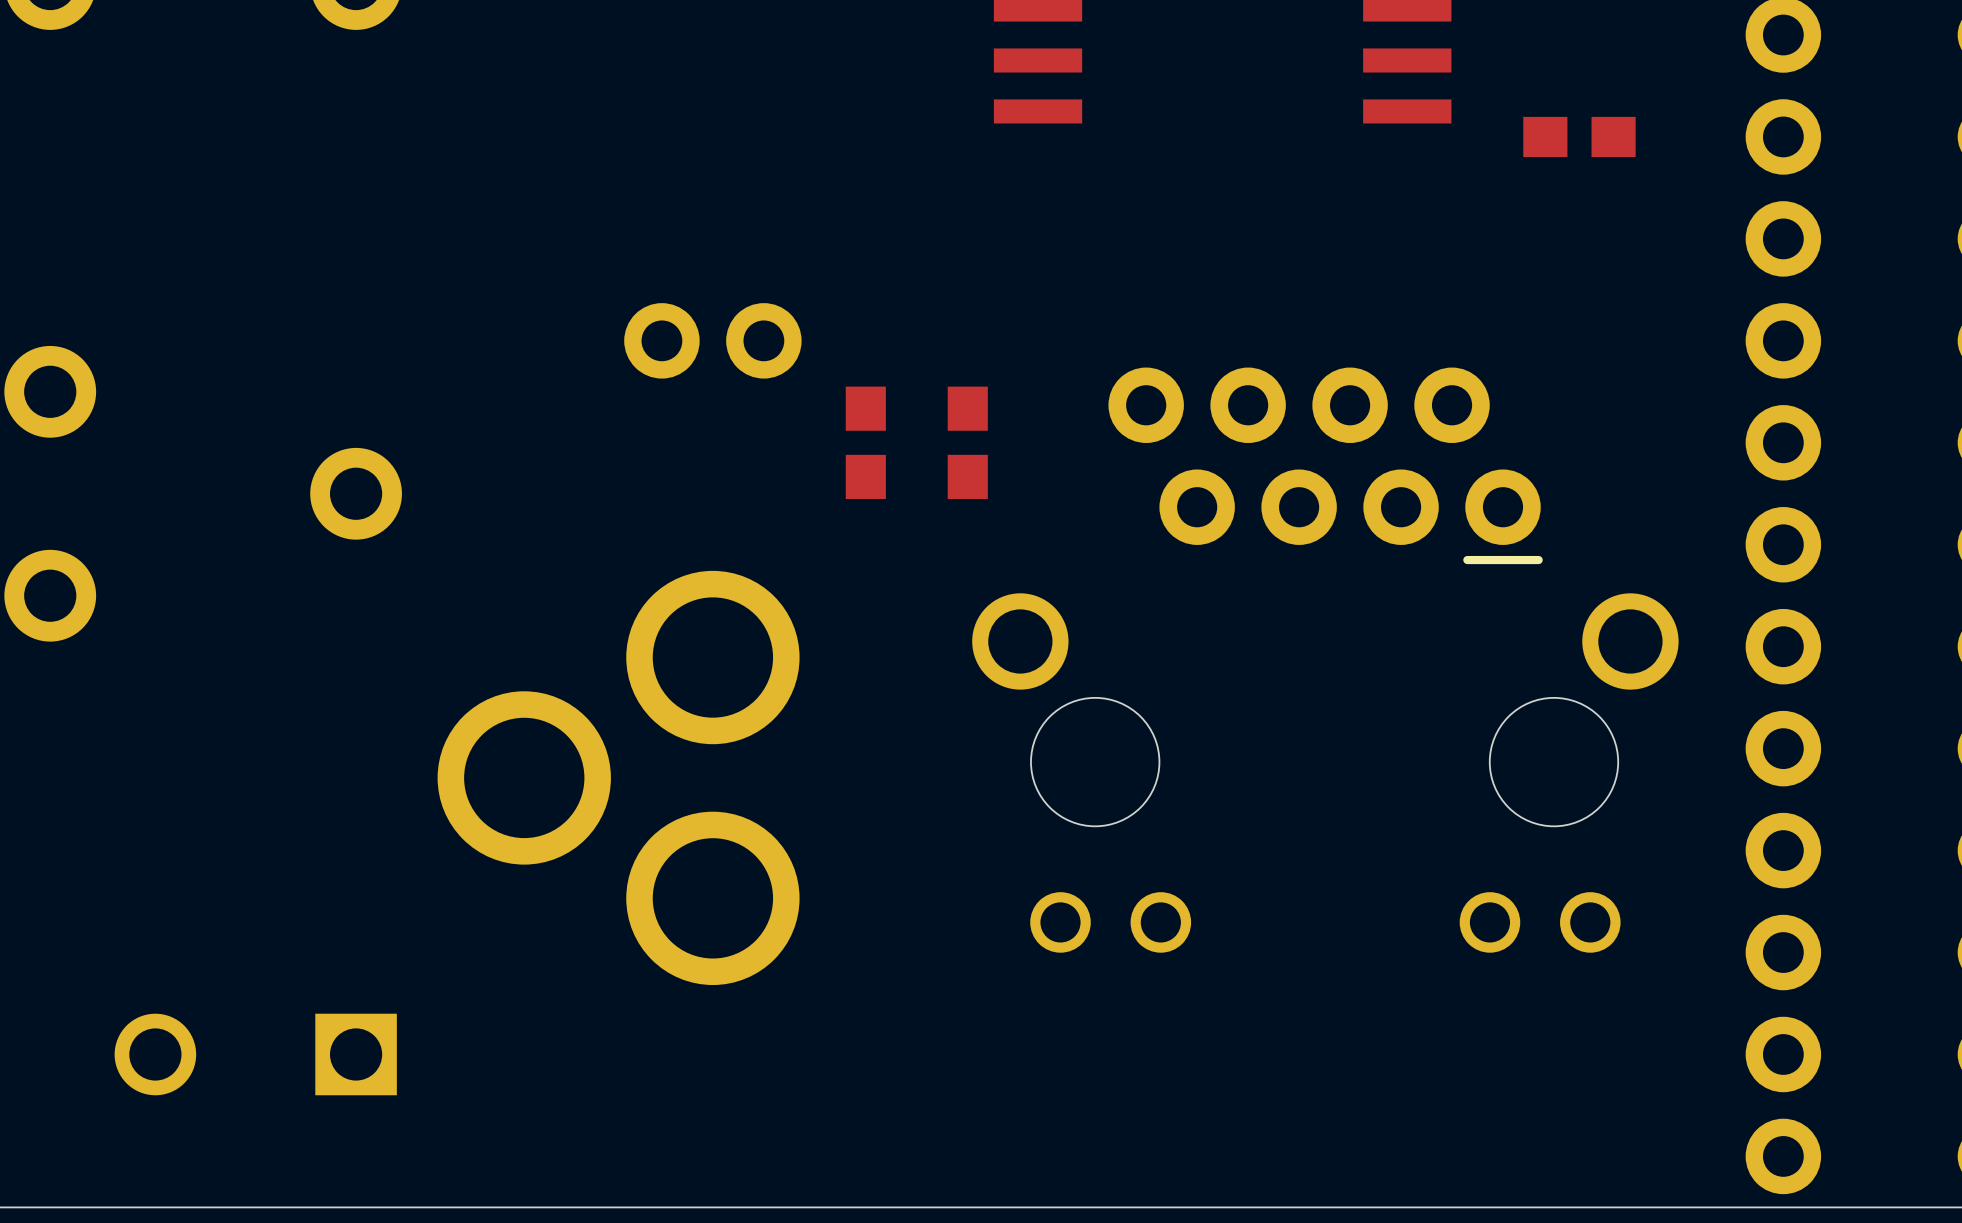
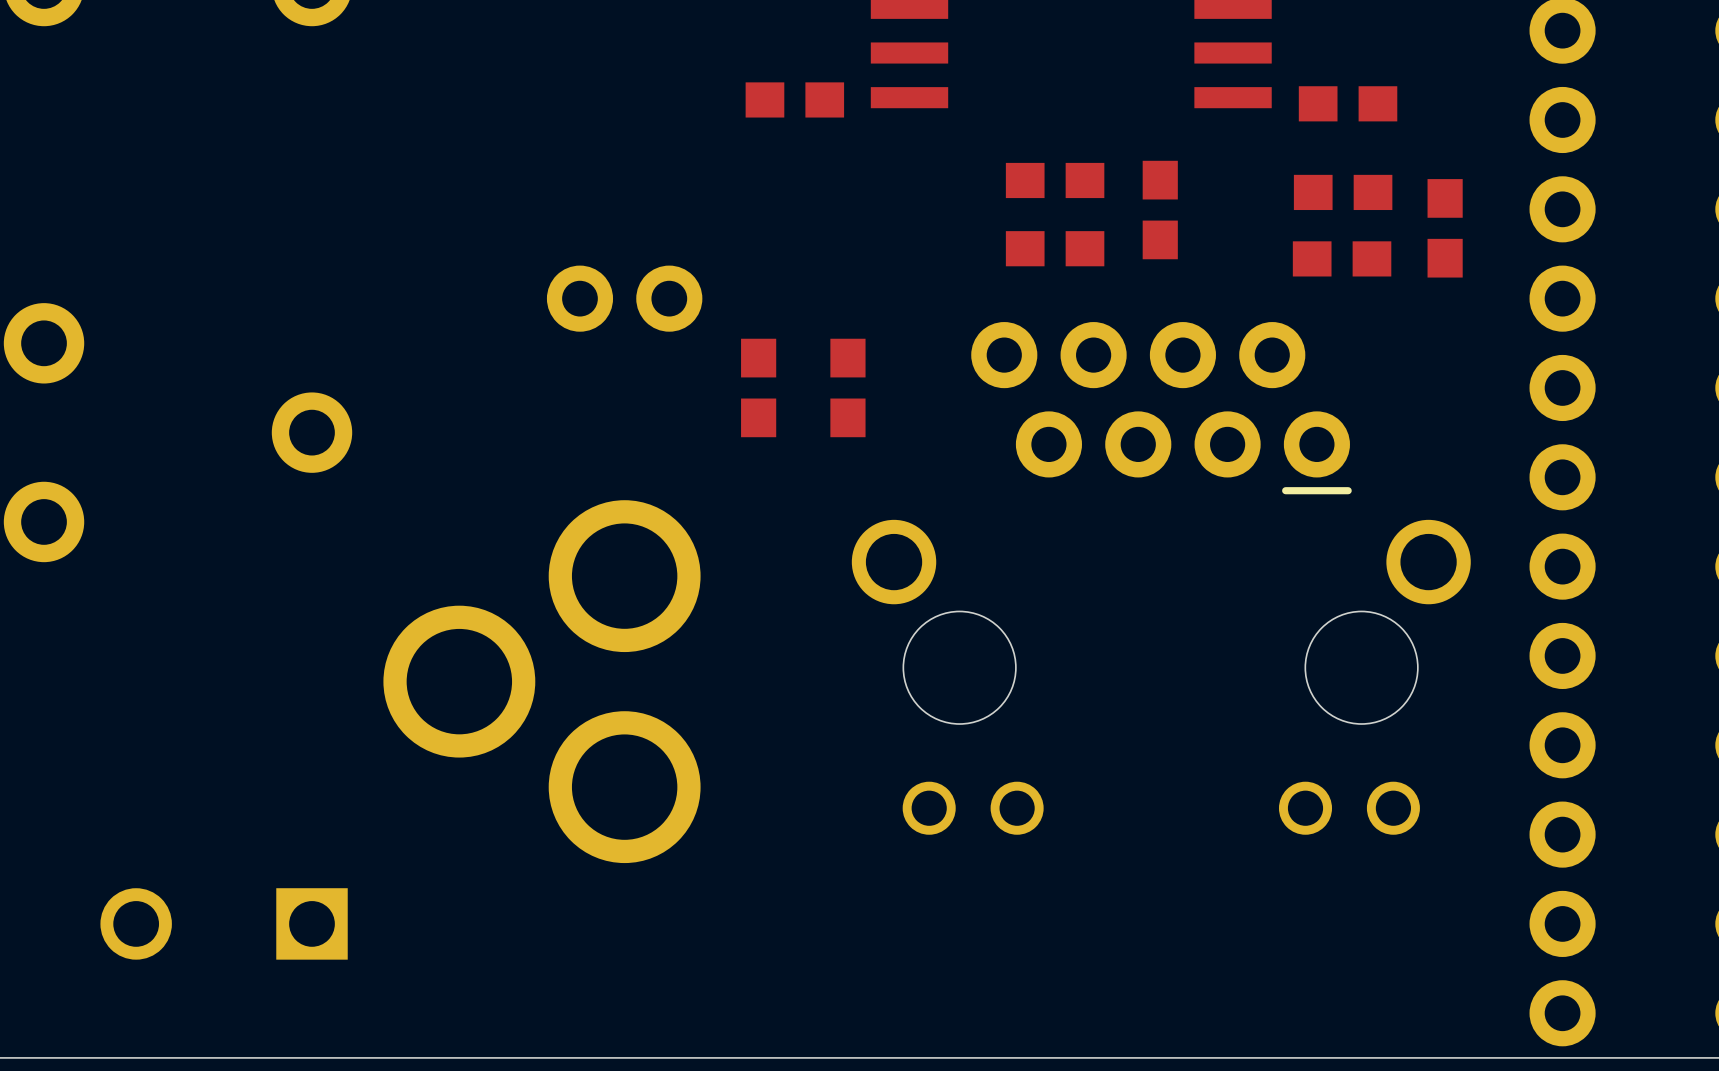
part: none -> (794, 99)
part position: (1579, 136) -> (1348, 103)
part: none -> (1055, 180)
part: none -> (1343, 192)
part: none -> (1160, 210)
part: none -> (1445, 228)
part: none -> (1055, 248)
part: none -> (1342, 258)

